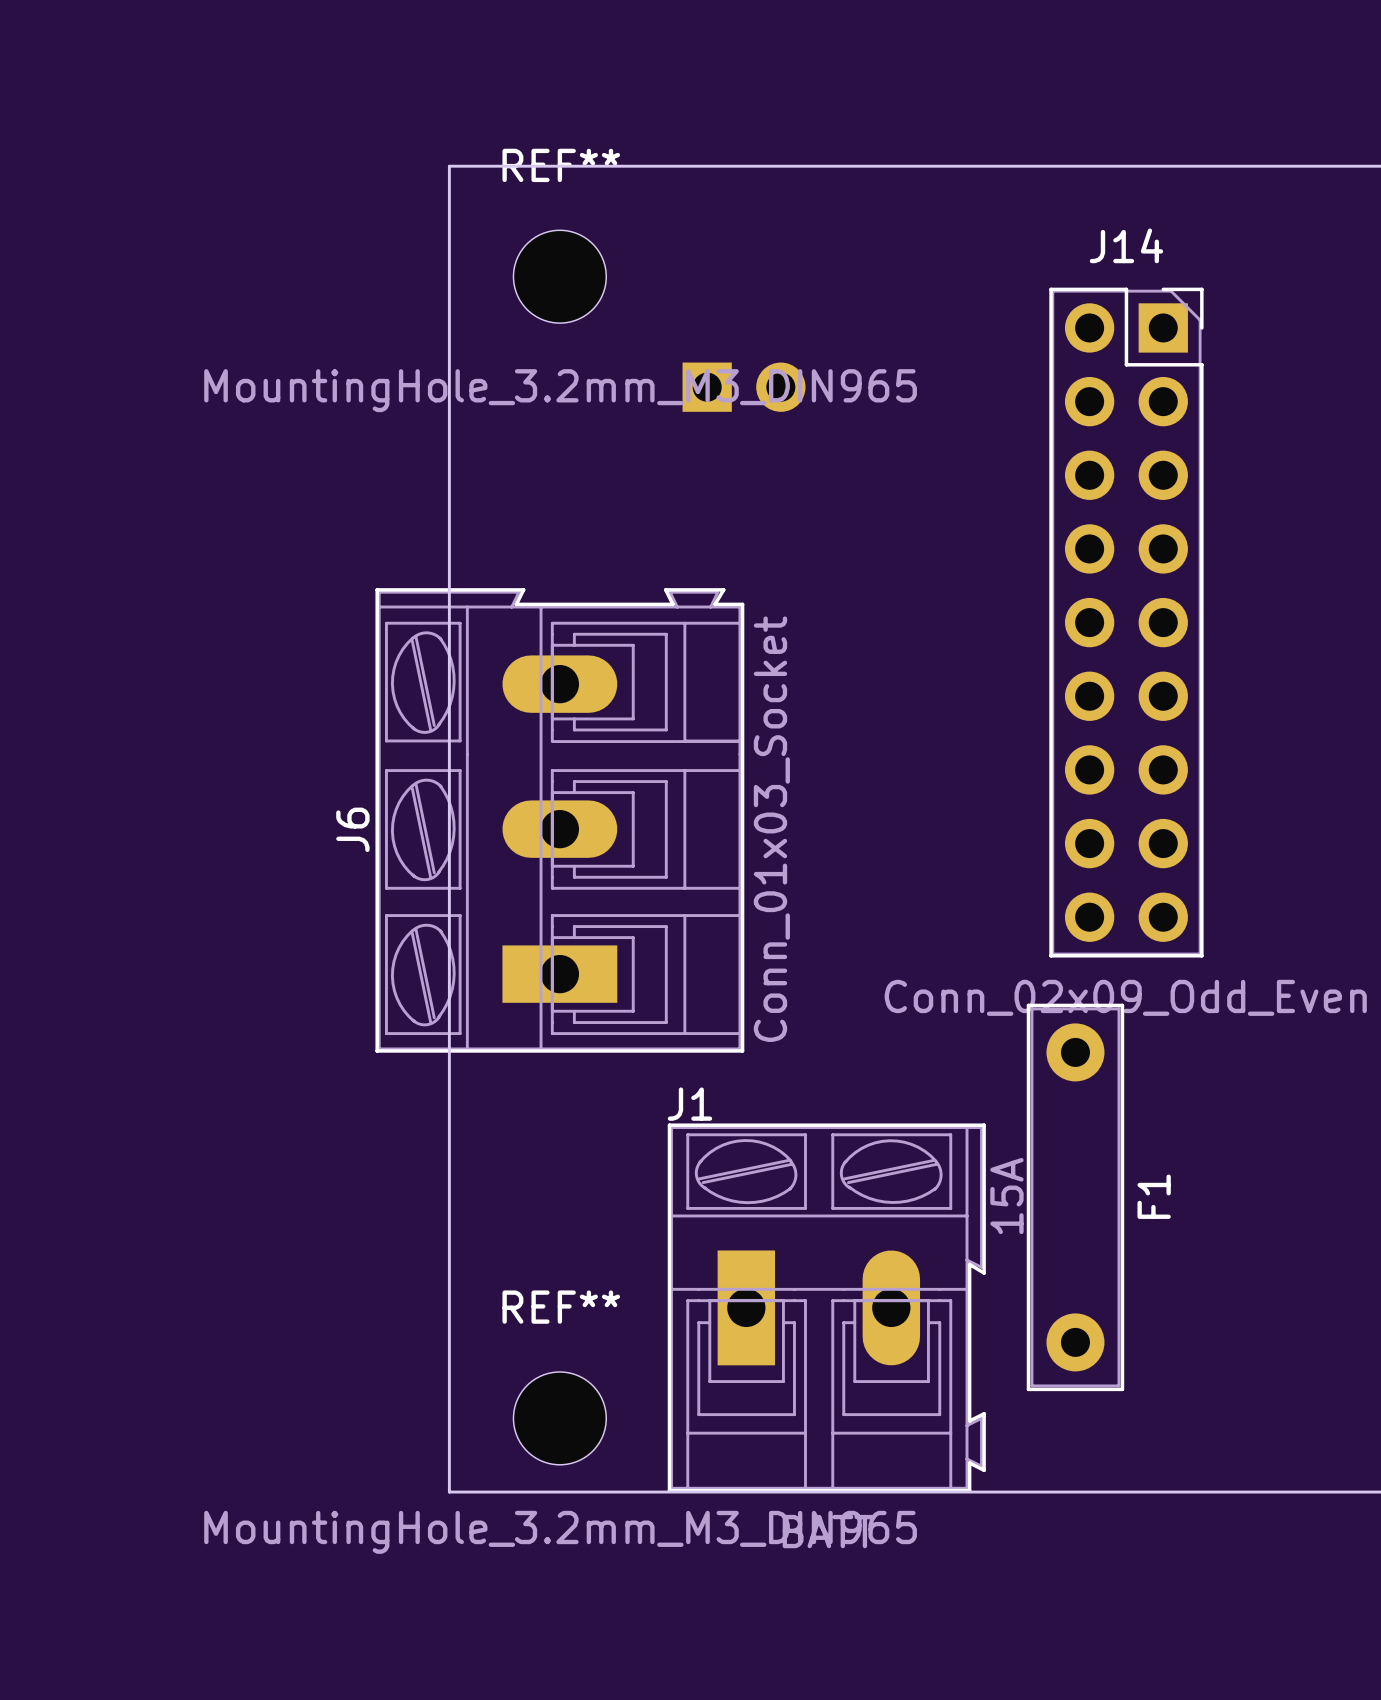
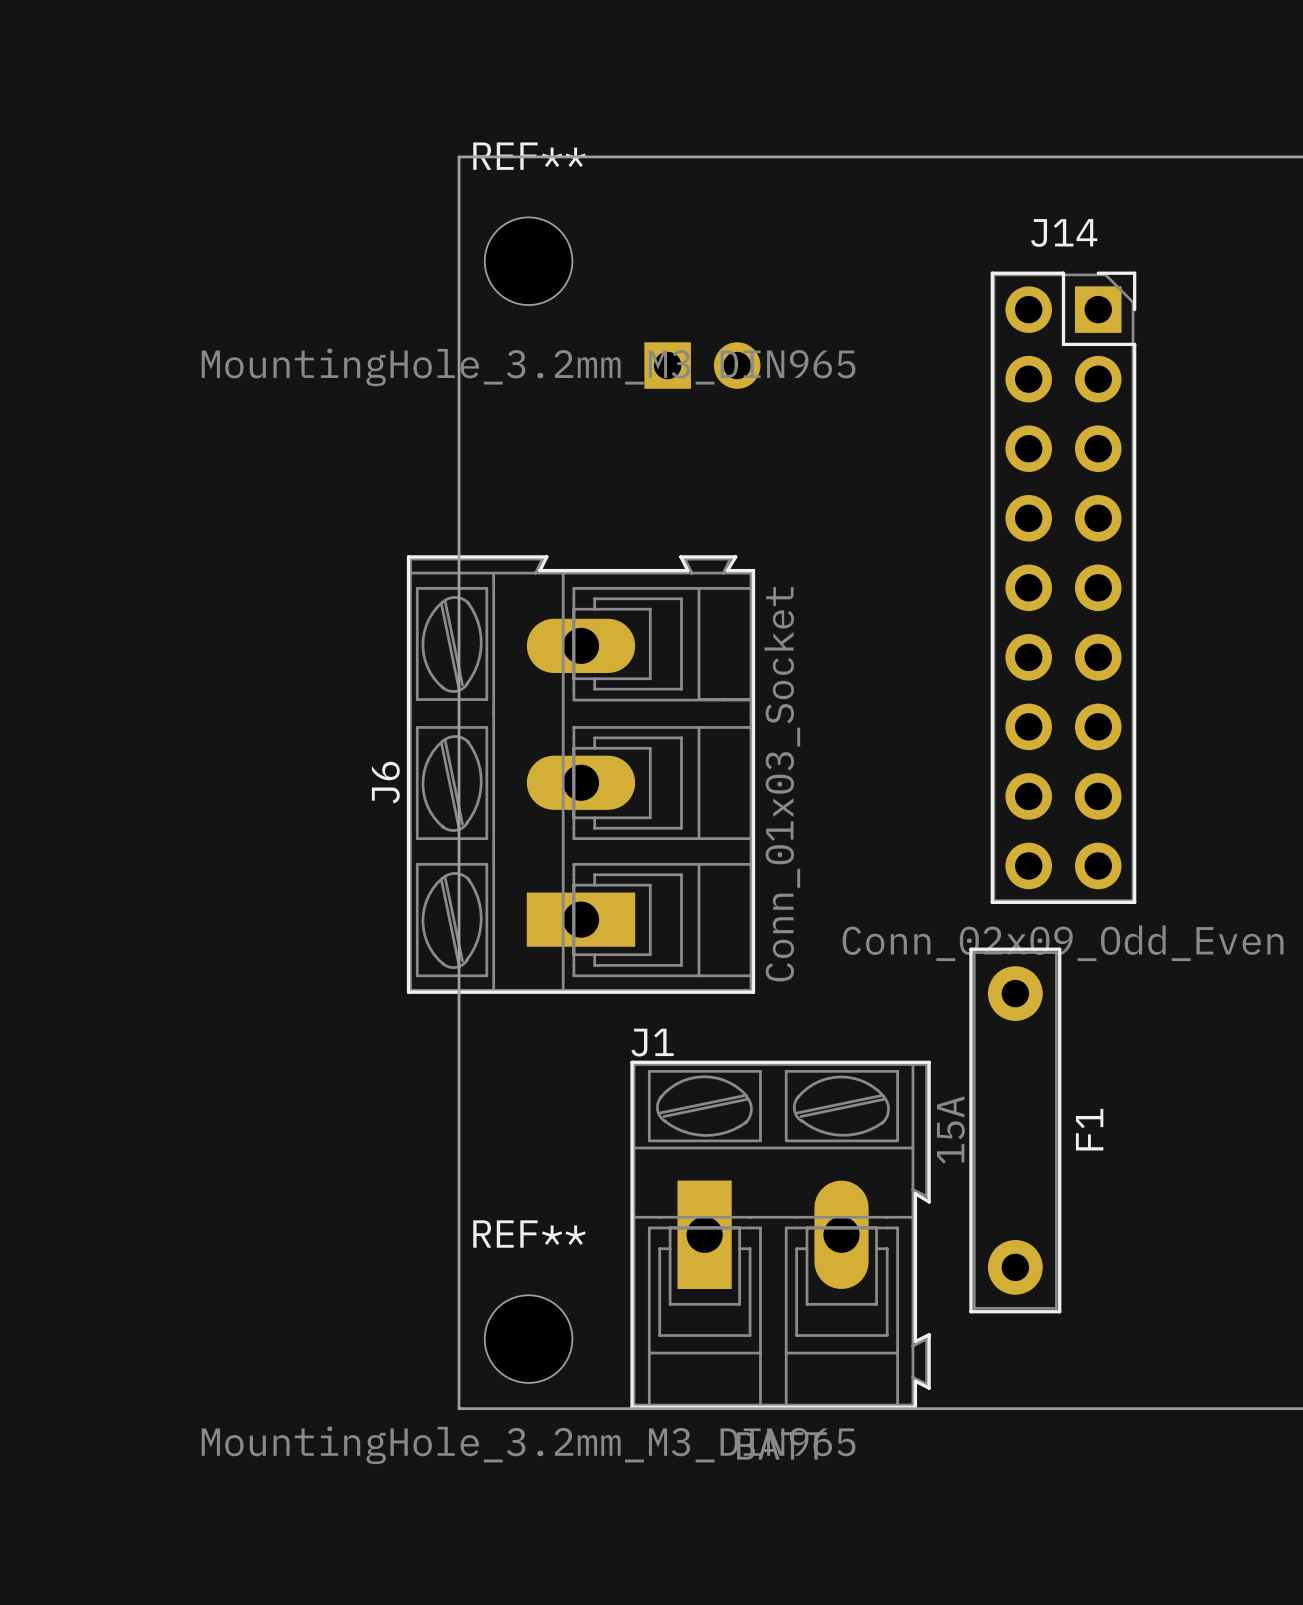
board edge: (486, 166) (449, 166) (449, 1492) (486, 1492) -> (459, 156) (459, 1408)
J6 position: (559, 820) -> (581, 774)

